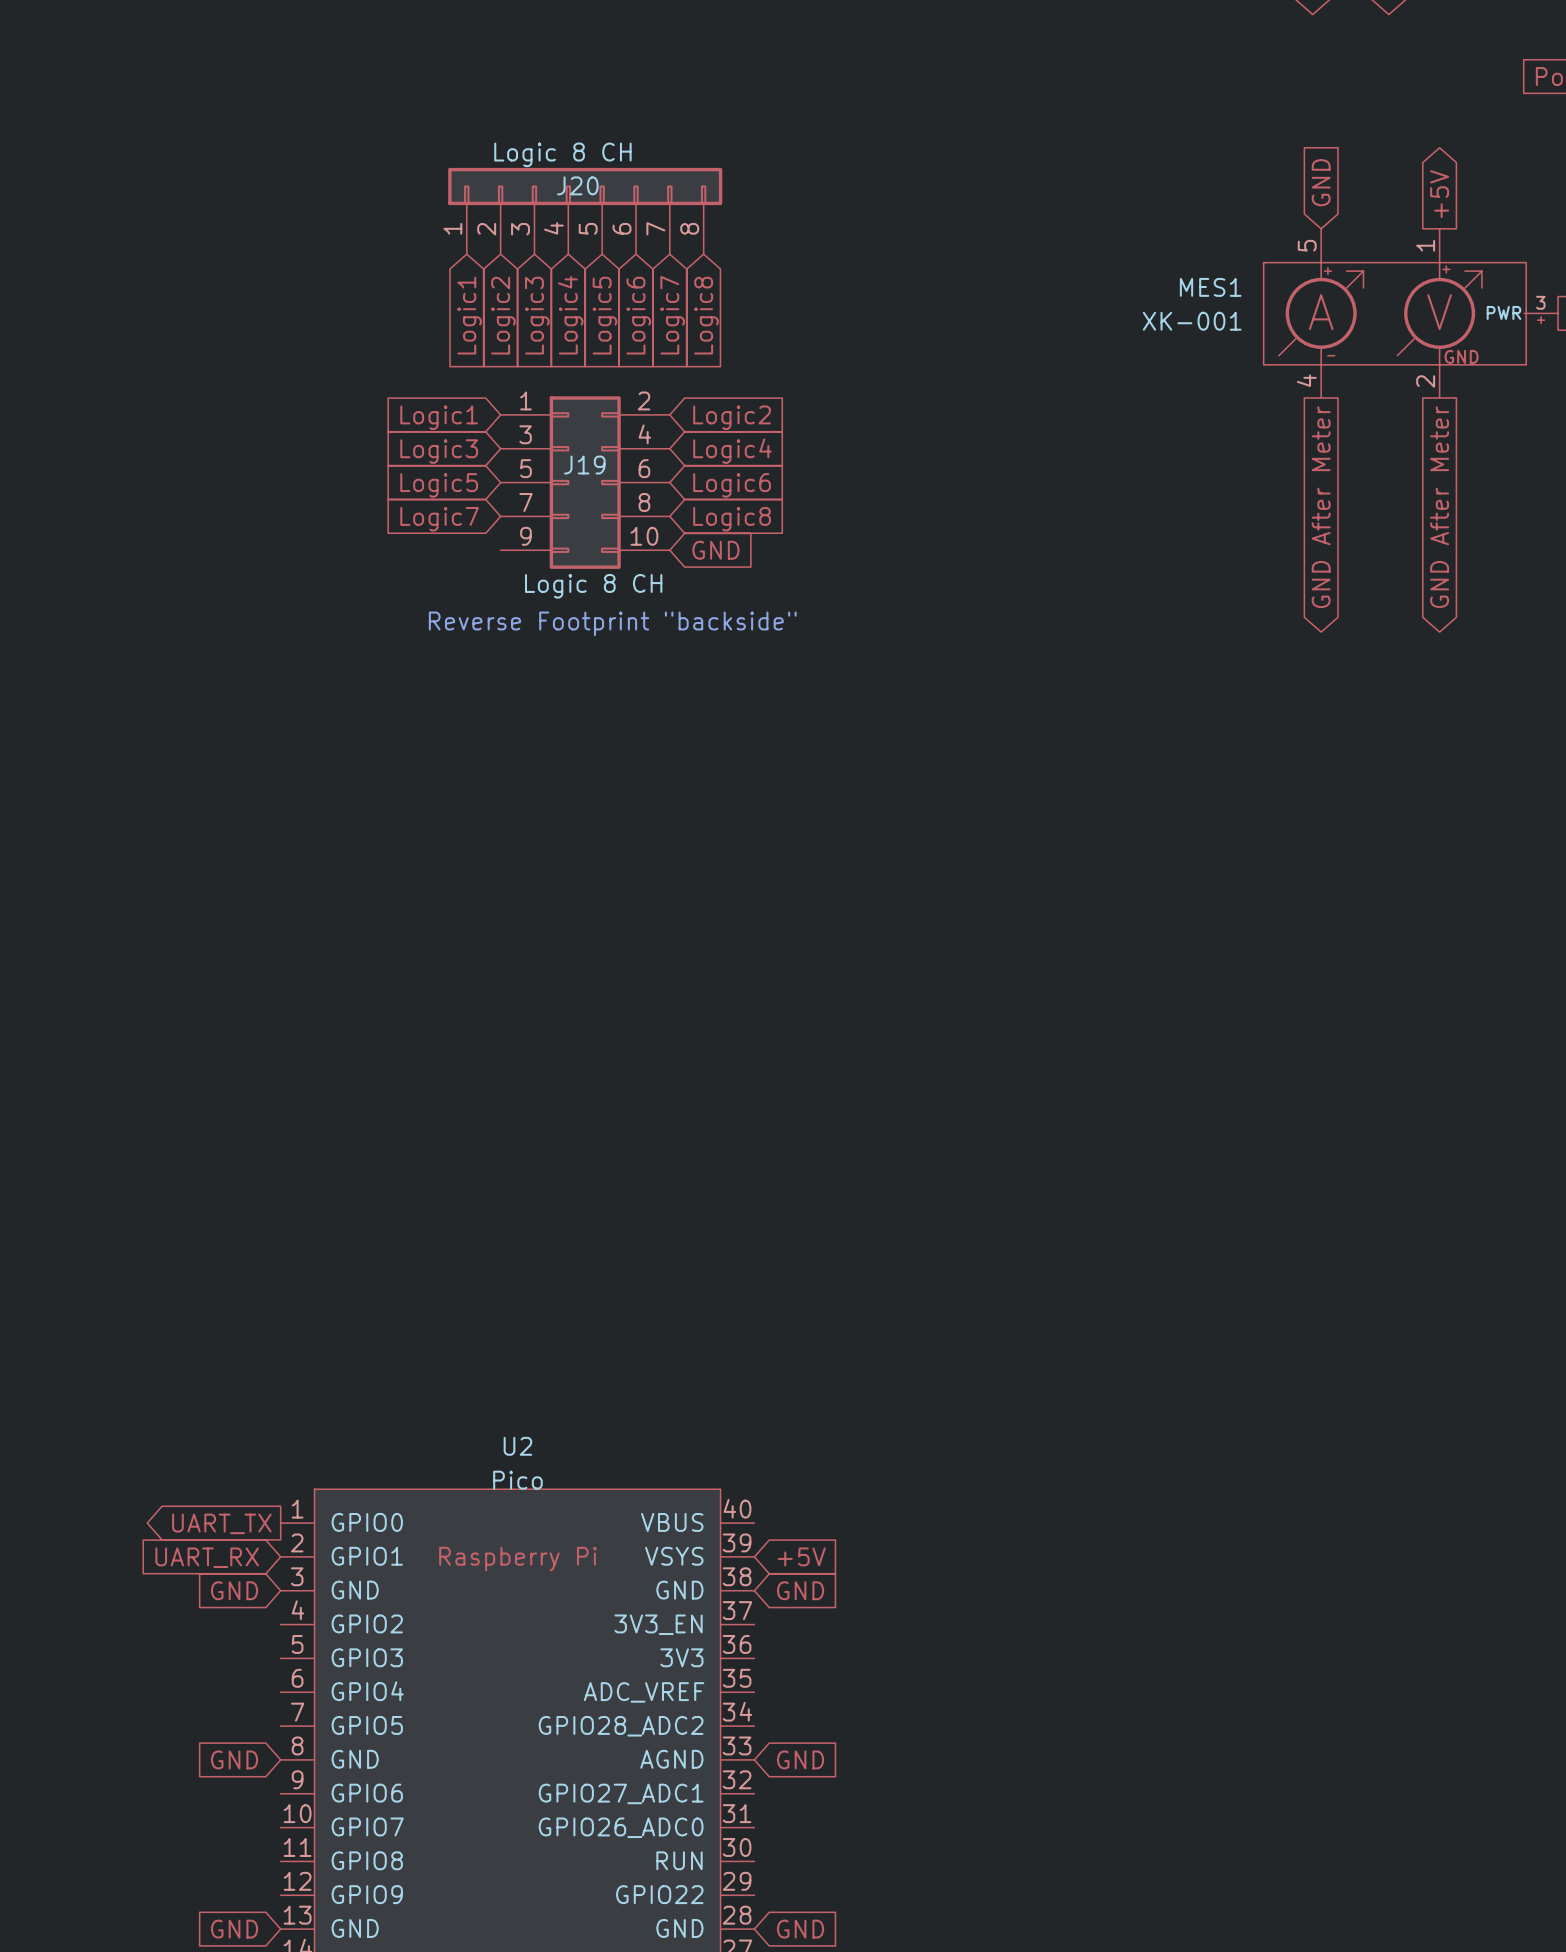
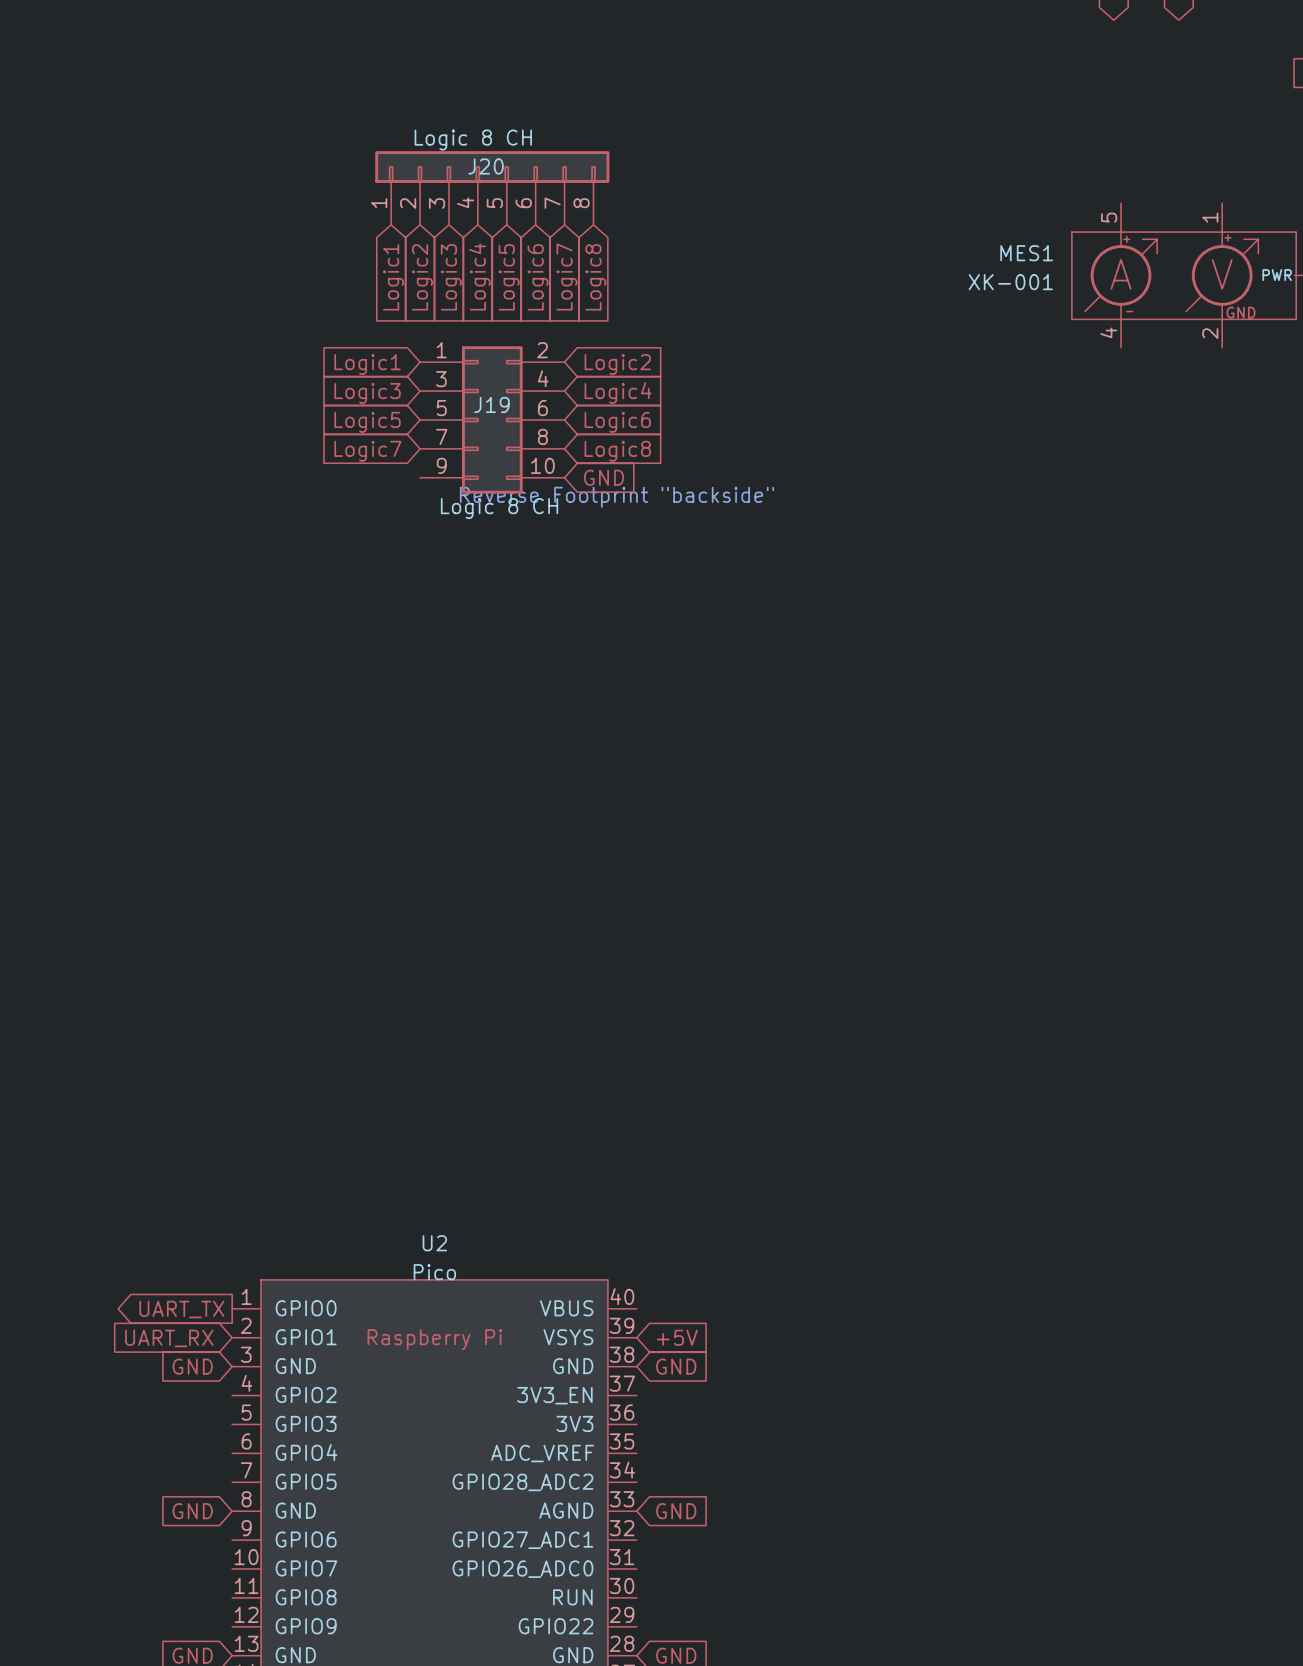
global label: GND (1321, 182) -> none
global label: +5V (1439, 194) -> none
global label: GND After Meter (1321, 507) -> none
global label: GND After Meter (1439, 507) -> none
text position: Reverse Footprint "backside" (612, 623) -> Reverse Footprint "backside" (616, 497)

